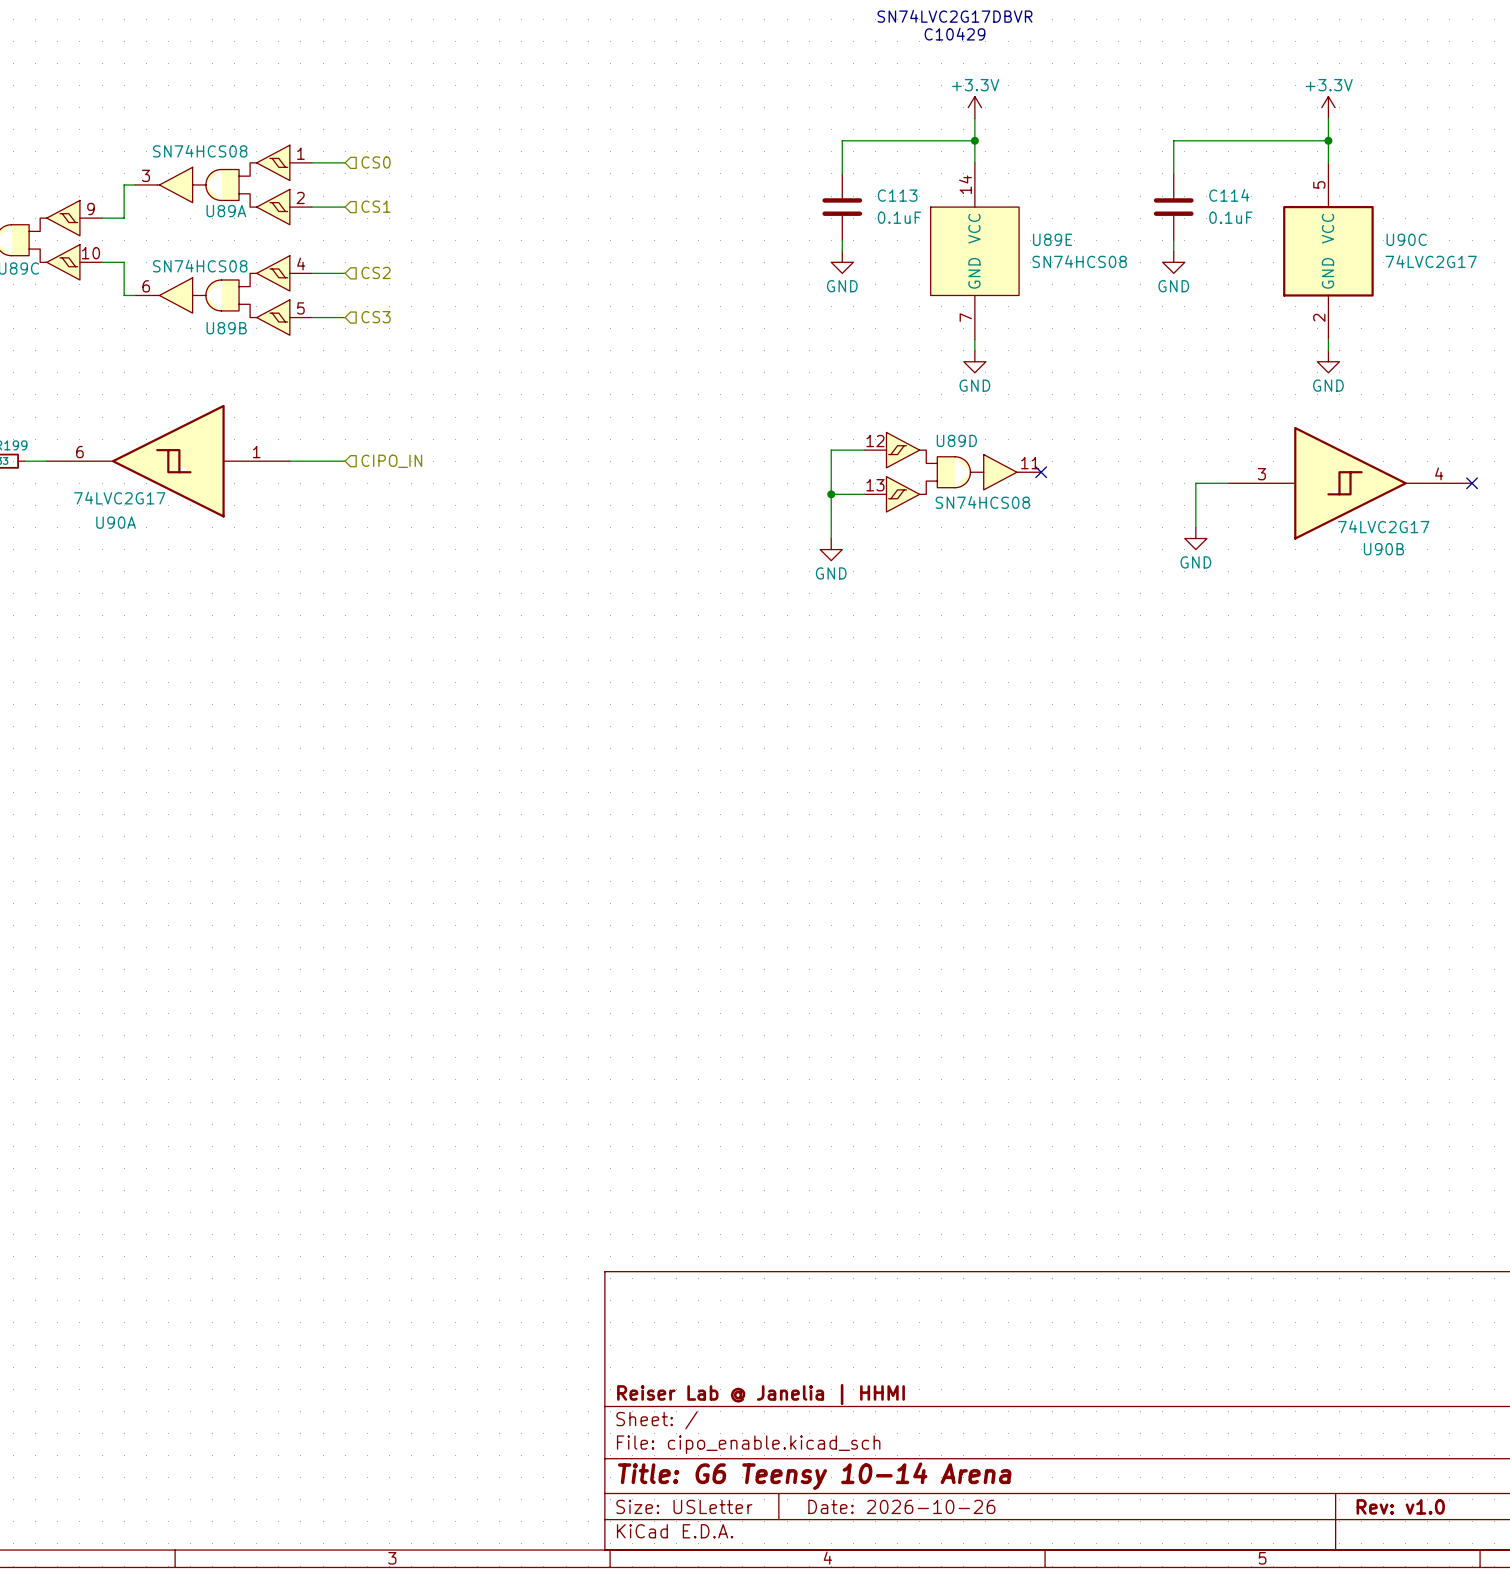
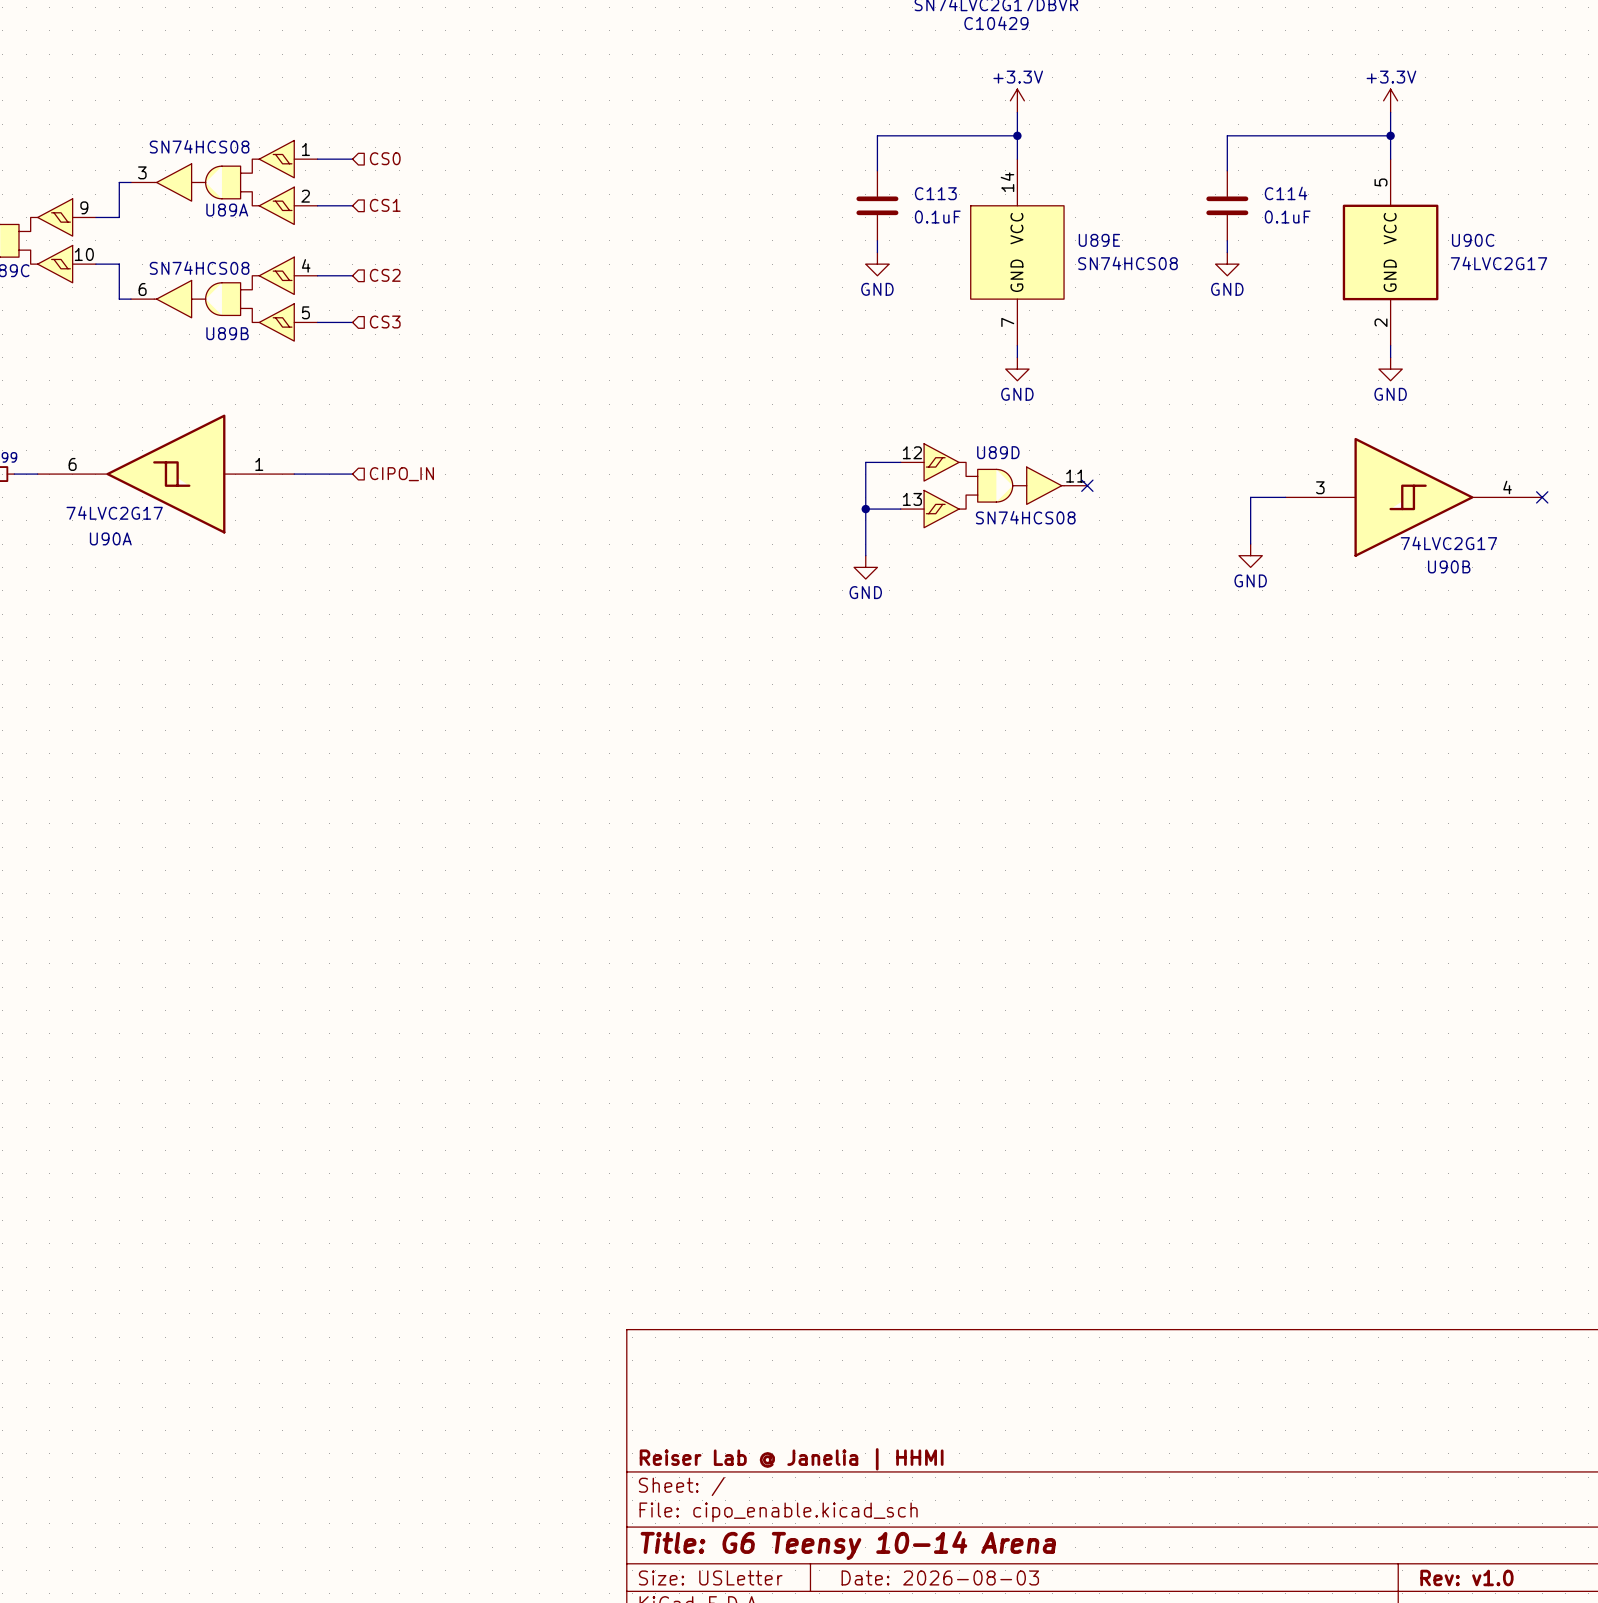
title block: Date: 2026-10-26 (901, 1506) -> Date: 2026-08-03 (940, 1577)

